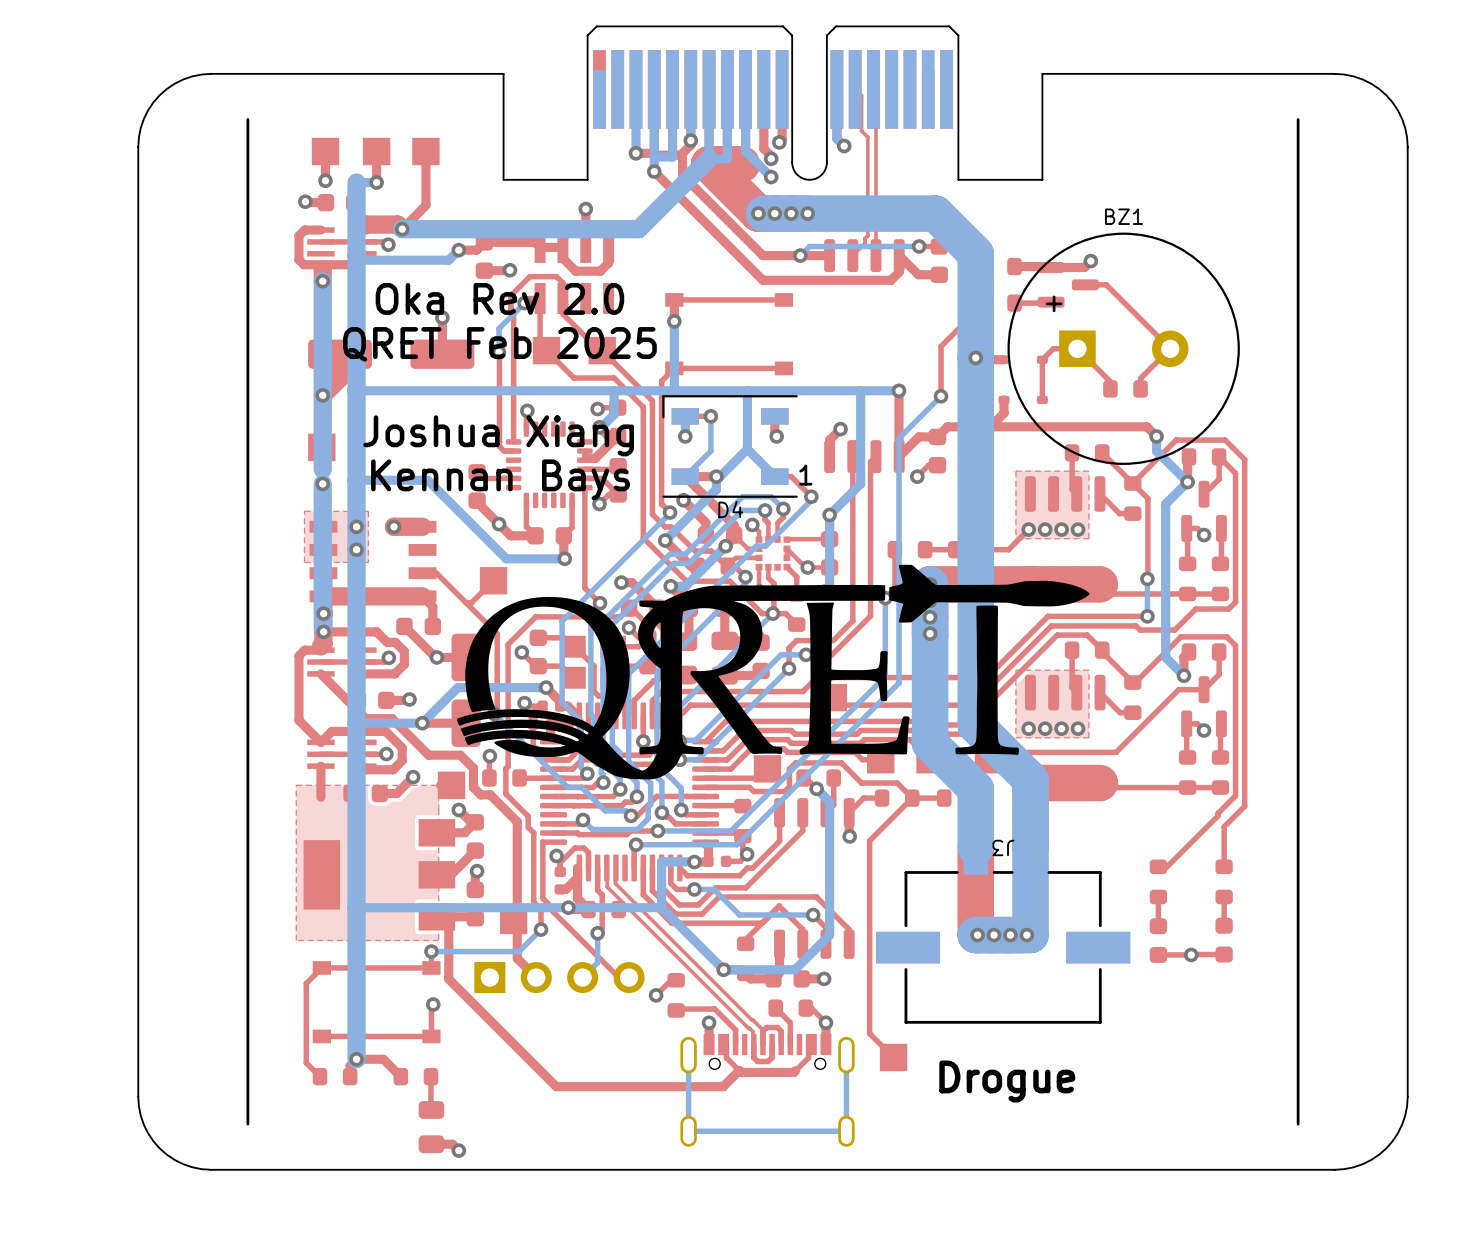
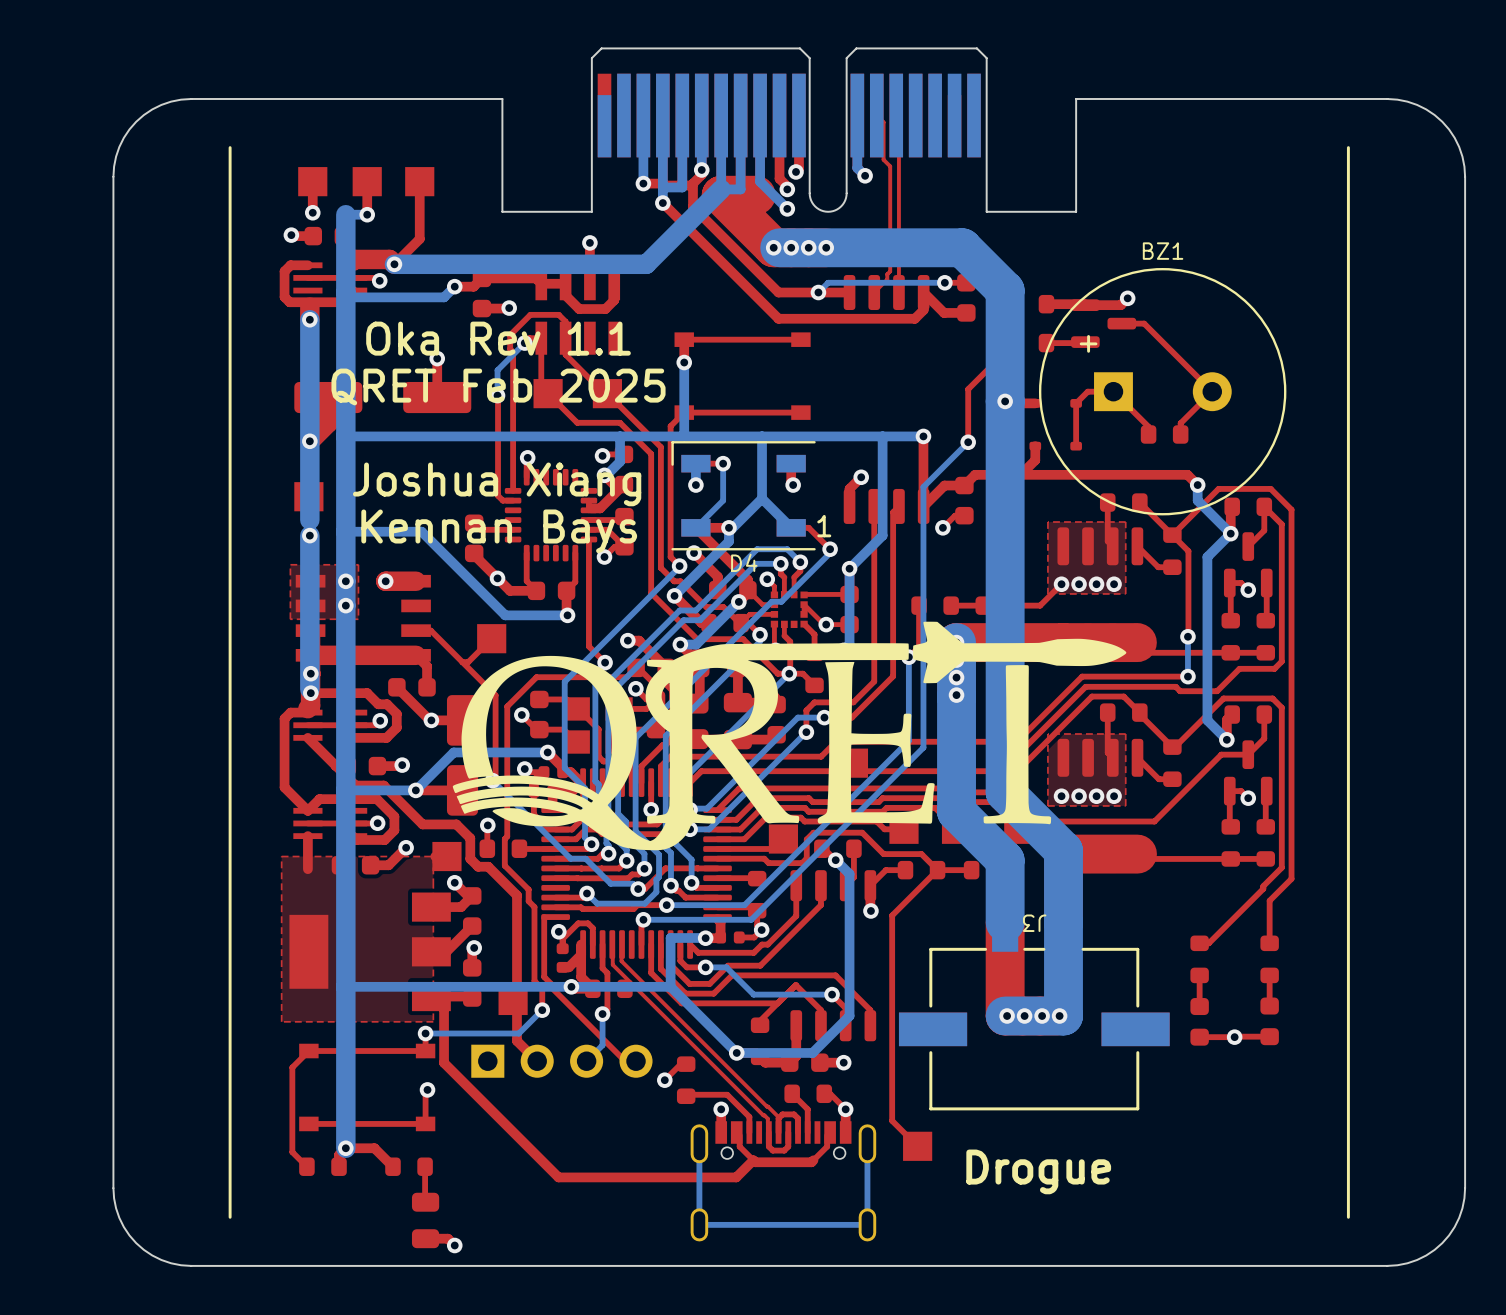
text: Oka Rev 2.0 (499, 298) -> Oka Rev 1.1 (498, 338)

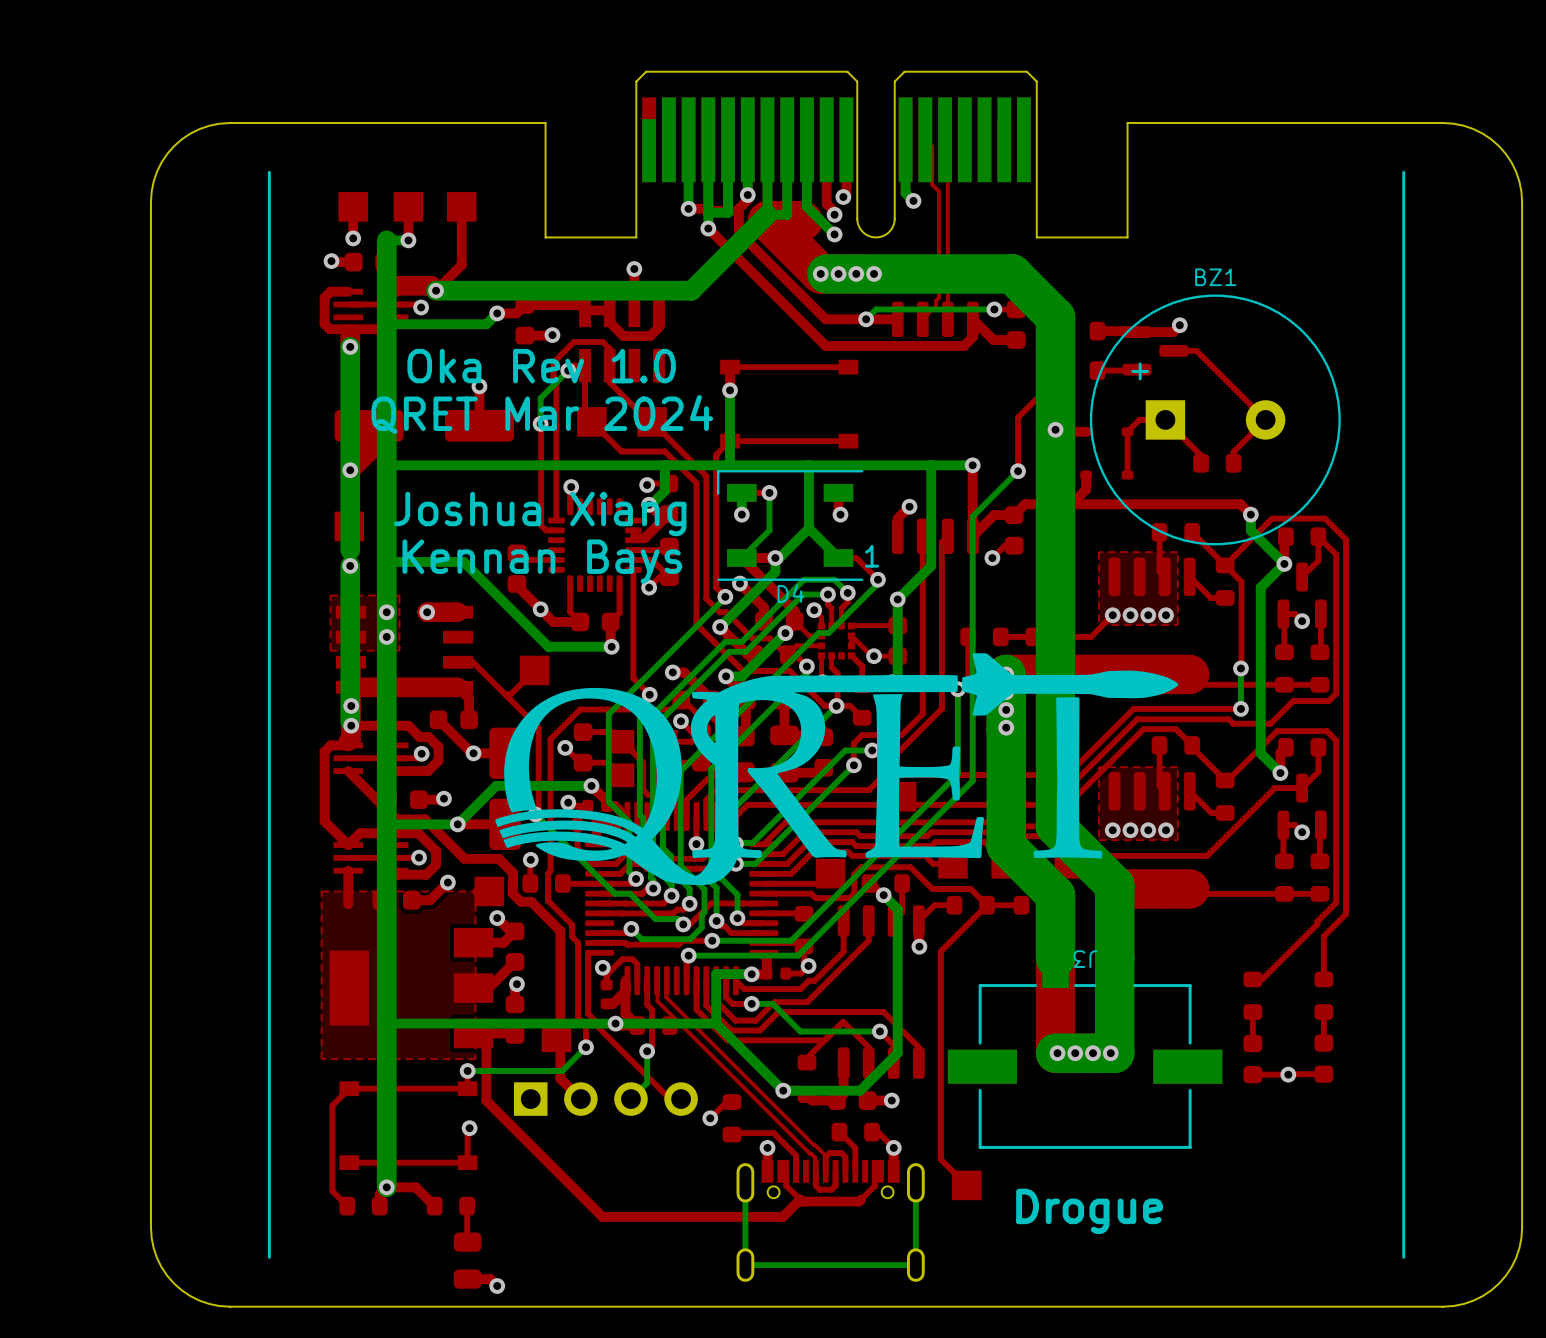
text: Oka Rev 1.1 (498, 338) -> Oka Rev 1.0 (541, 366)
text: QRET Feb 2025 (498, 386) -> QRET Mar 2024 (542, 414)

